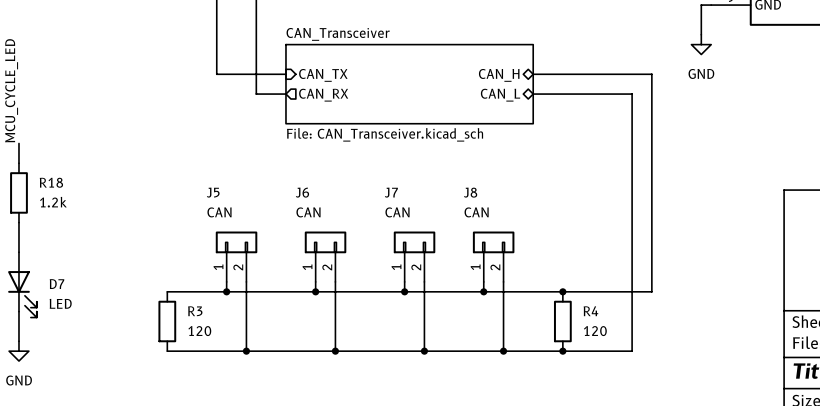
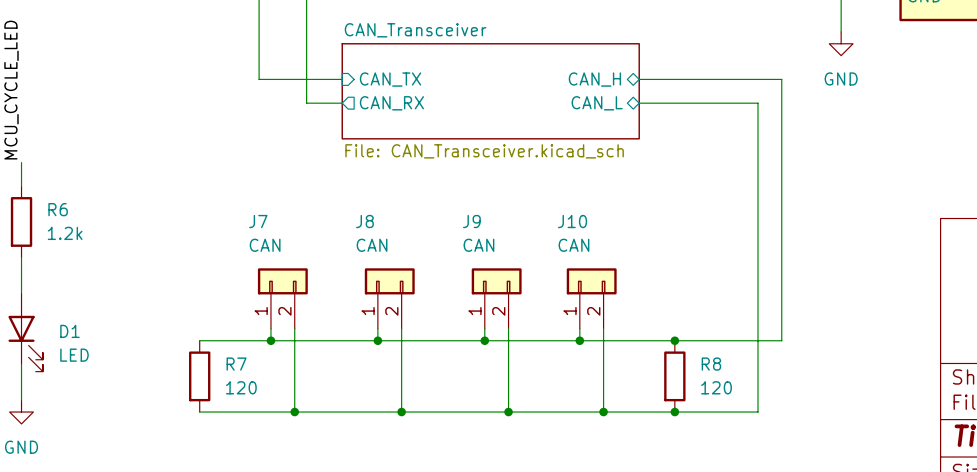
R18 name: R18 (51, 182) -> R6 (58, 209)
J5 name: J5 (213, 192) -> J7 (258, 221)
J6 name: J6 (302, 192) -> J8 (364, 221)
J7 name: J7 (391, 192) -> J9 (471, 221)
J8 name: J8 (470, 192) -> J10 (572, 221)
D7 name: D7 (57, 284) -> D1 (69, 331)
R3 name: R3 (195, 311) -> R7 (236, 364)
R4 name: R4 (590, 311) -> R8 (711, 364)

